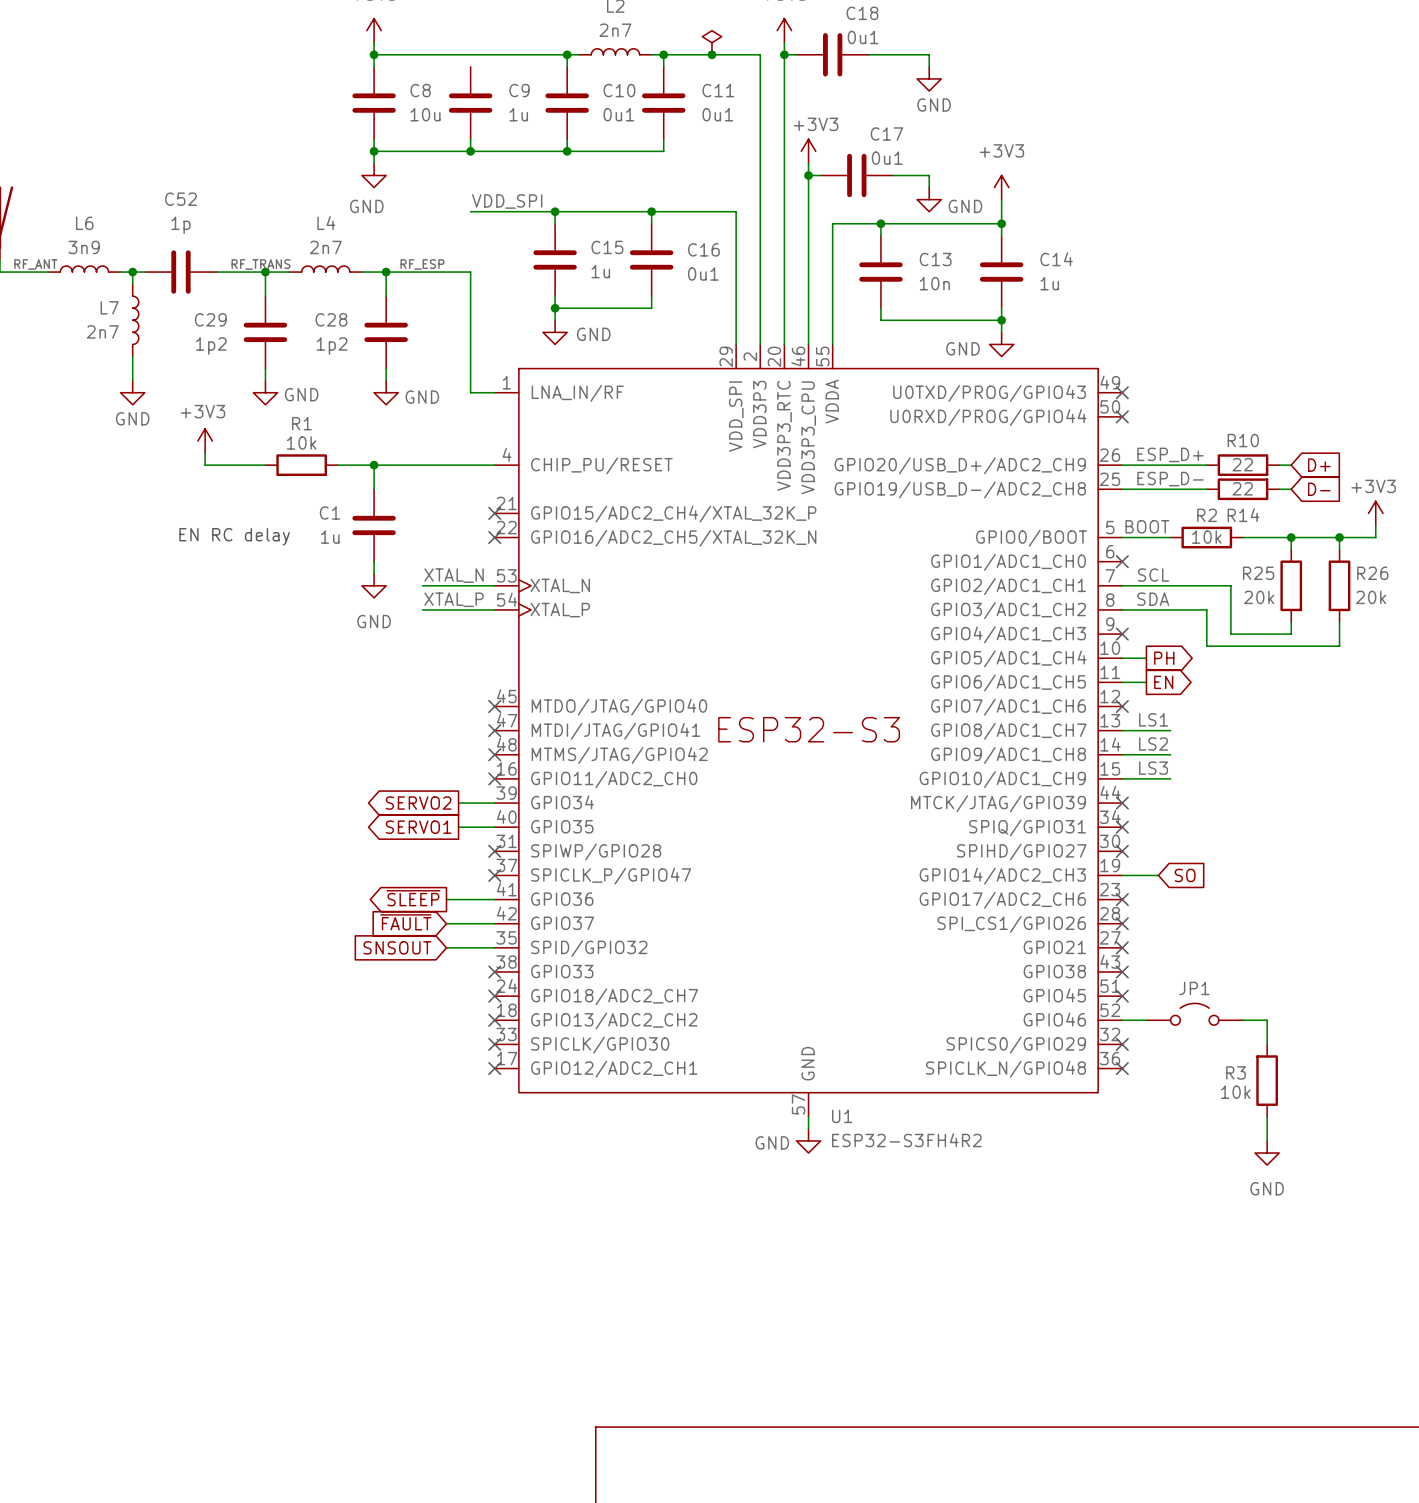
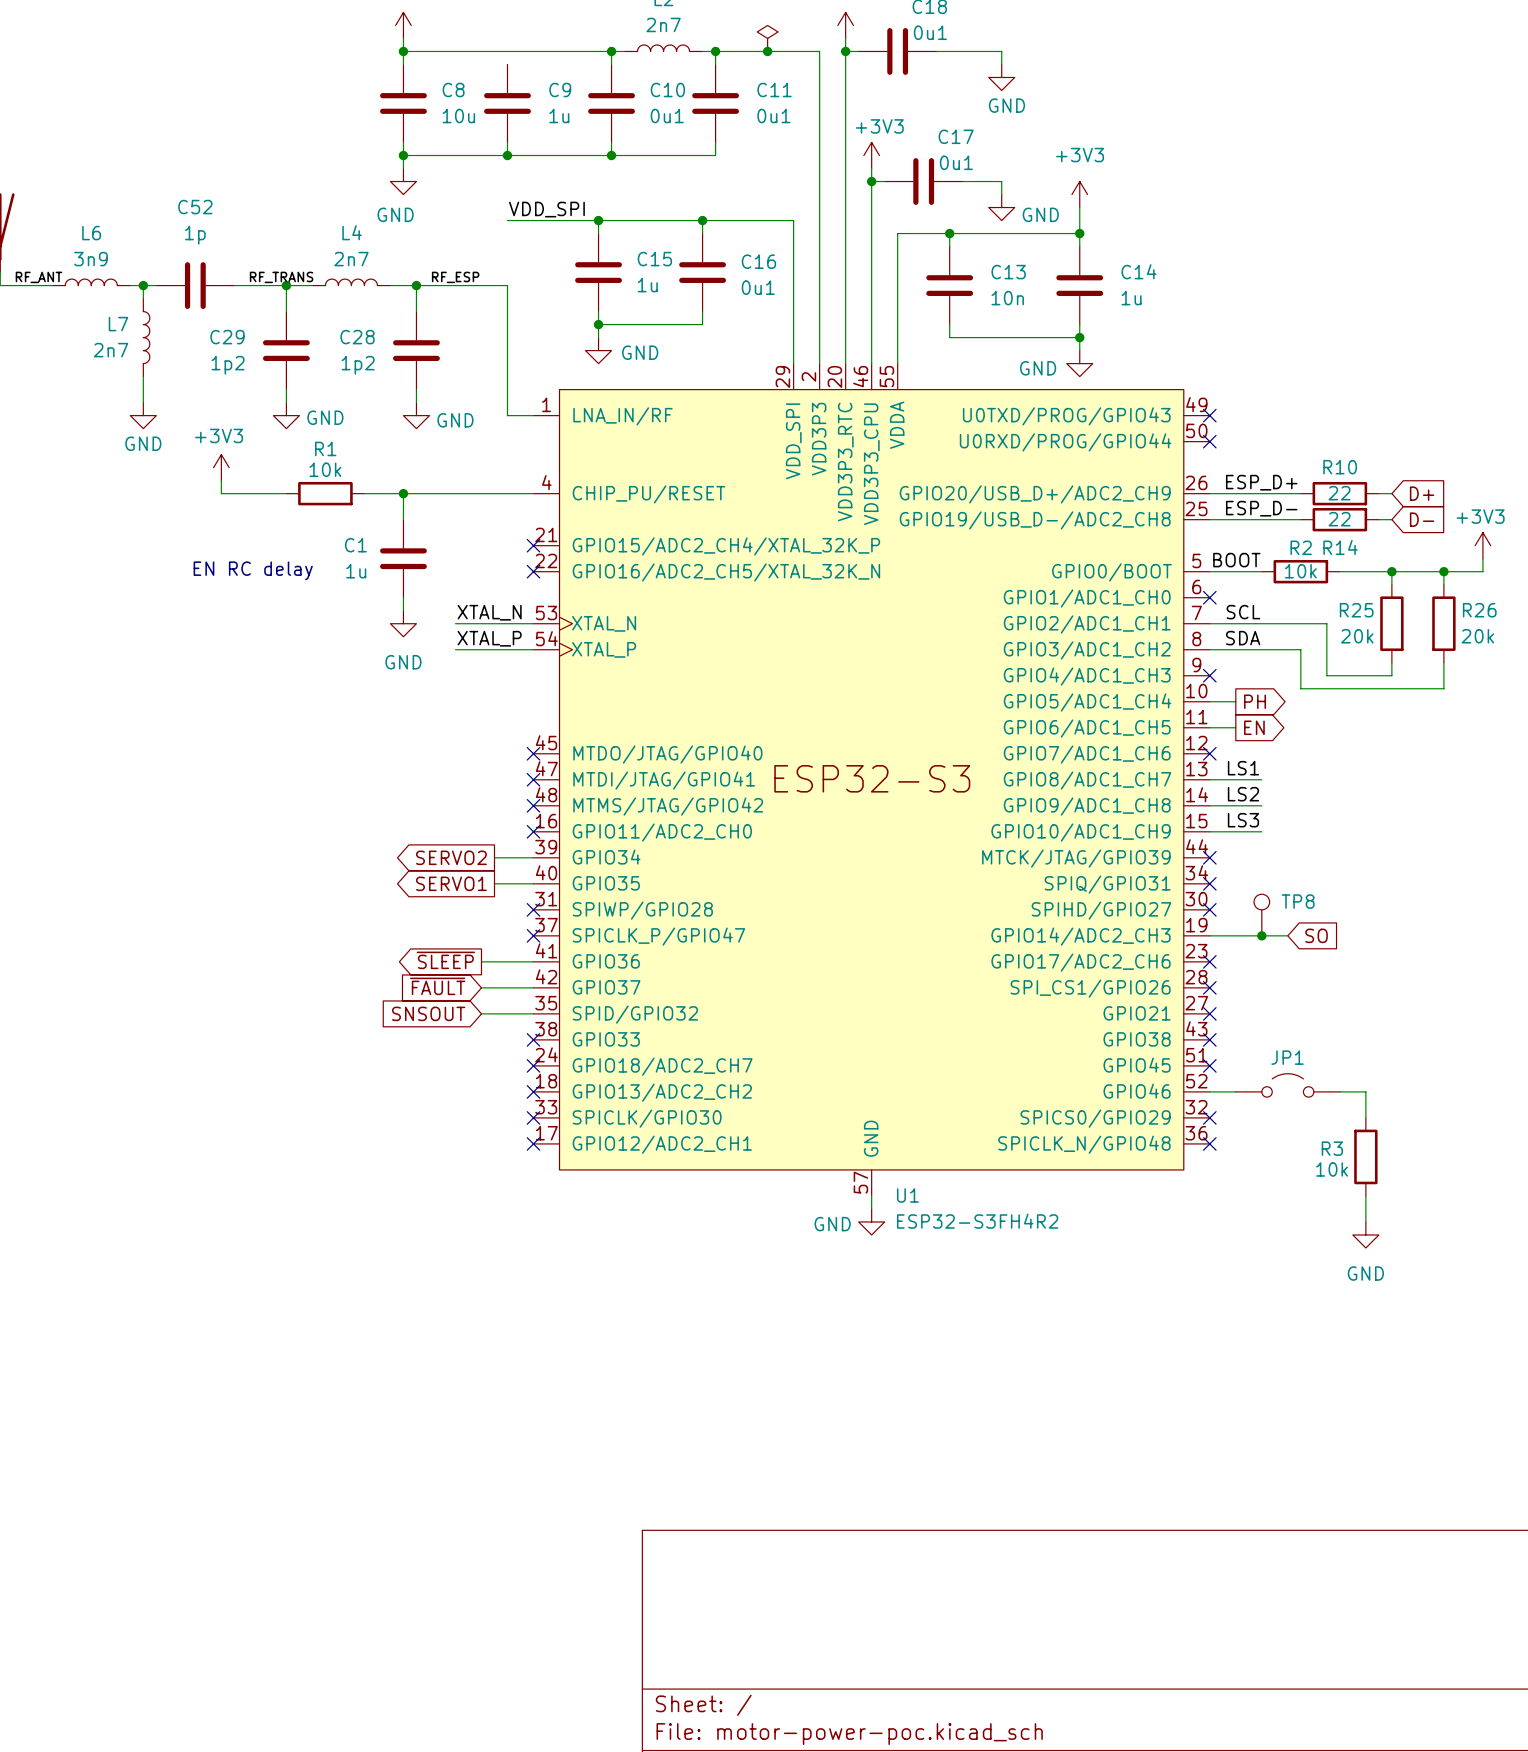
TP8: none -> (1261, 915)
wire: none -> (1248, 935) (1287, 935)
junction: none -> (1261, 935)
global label position: SO (1185, 875) -> SO (1316, 935)

